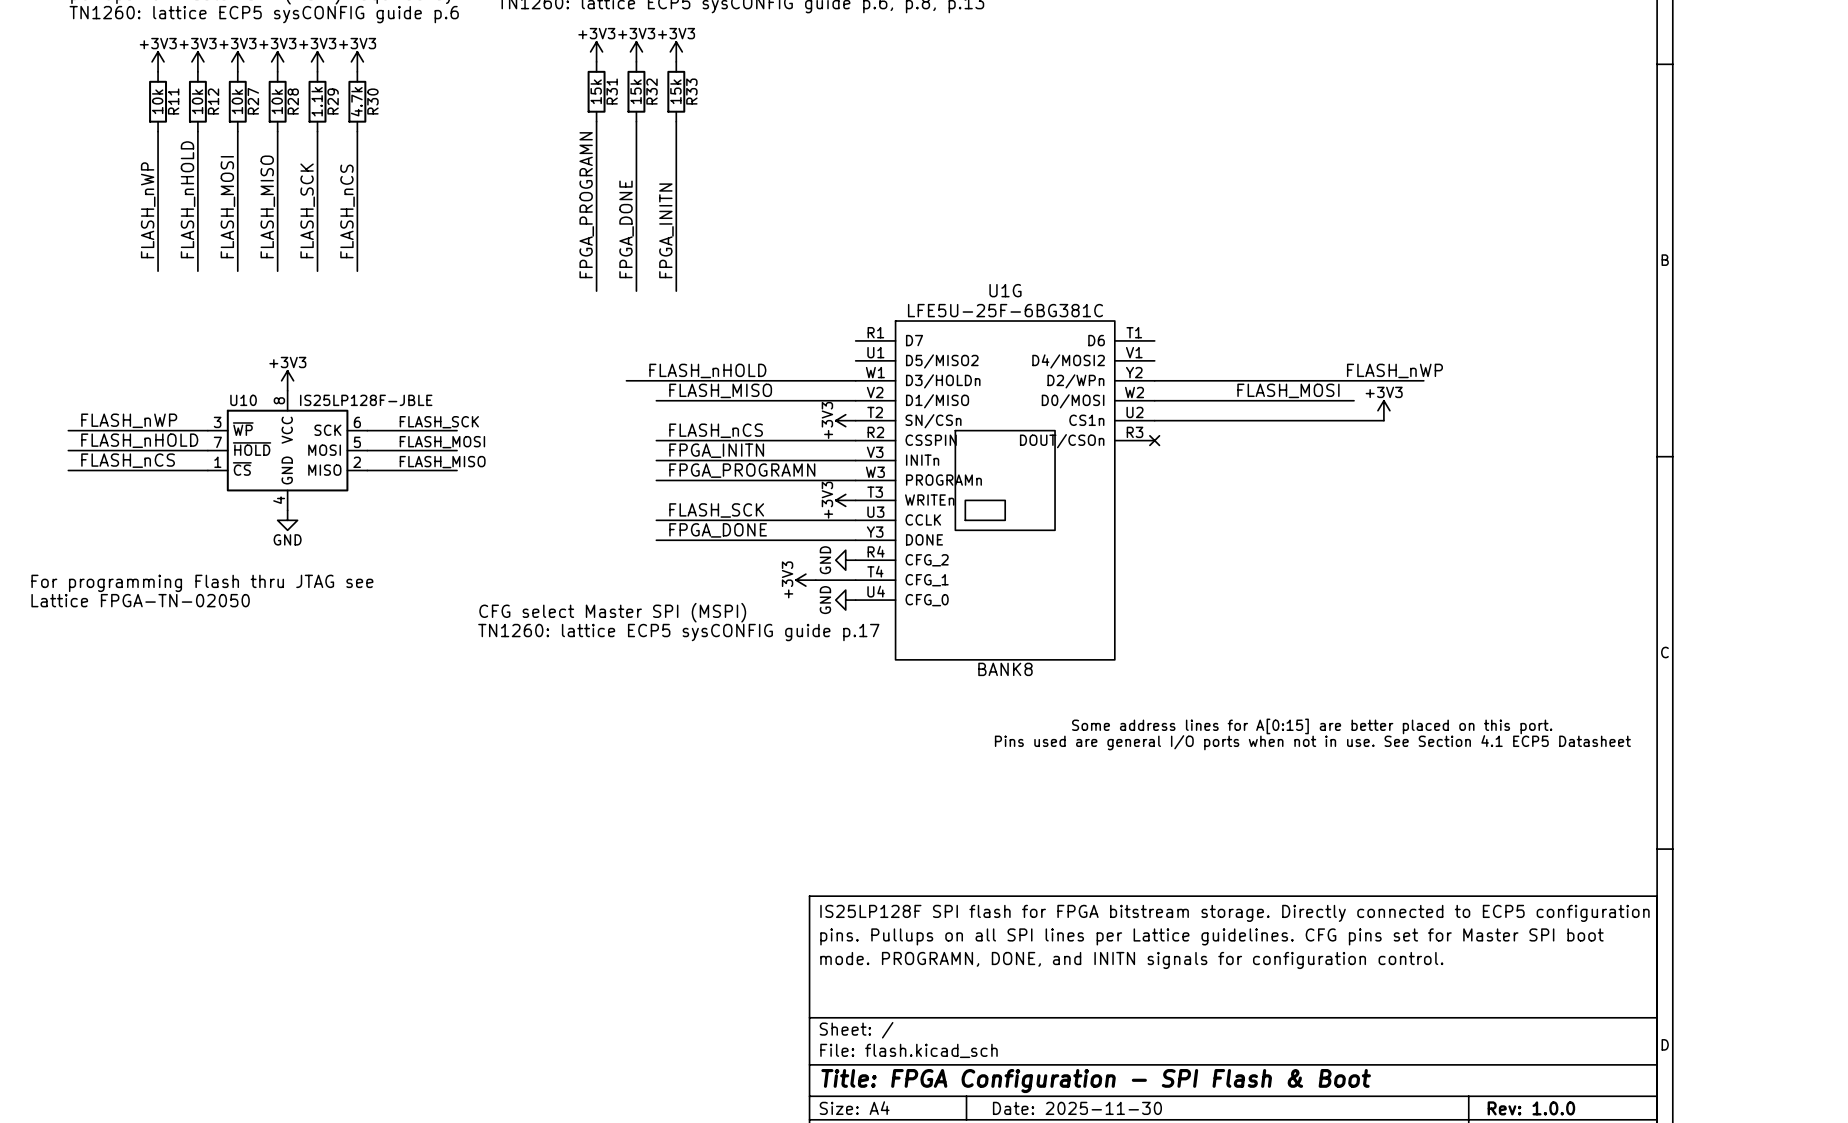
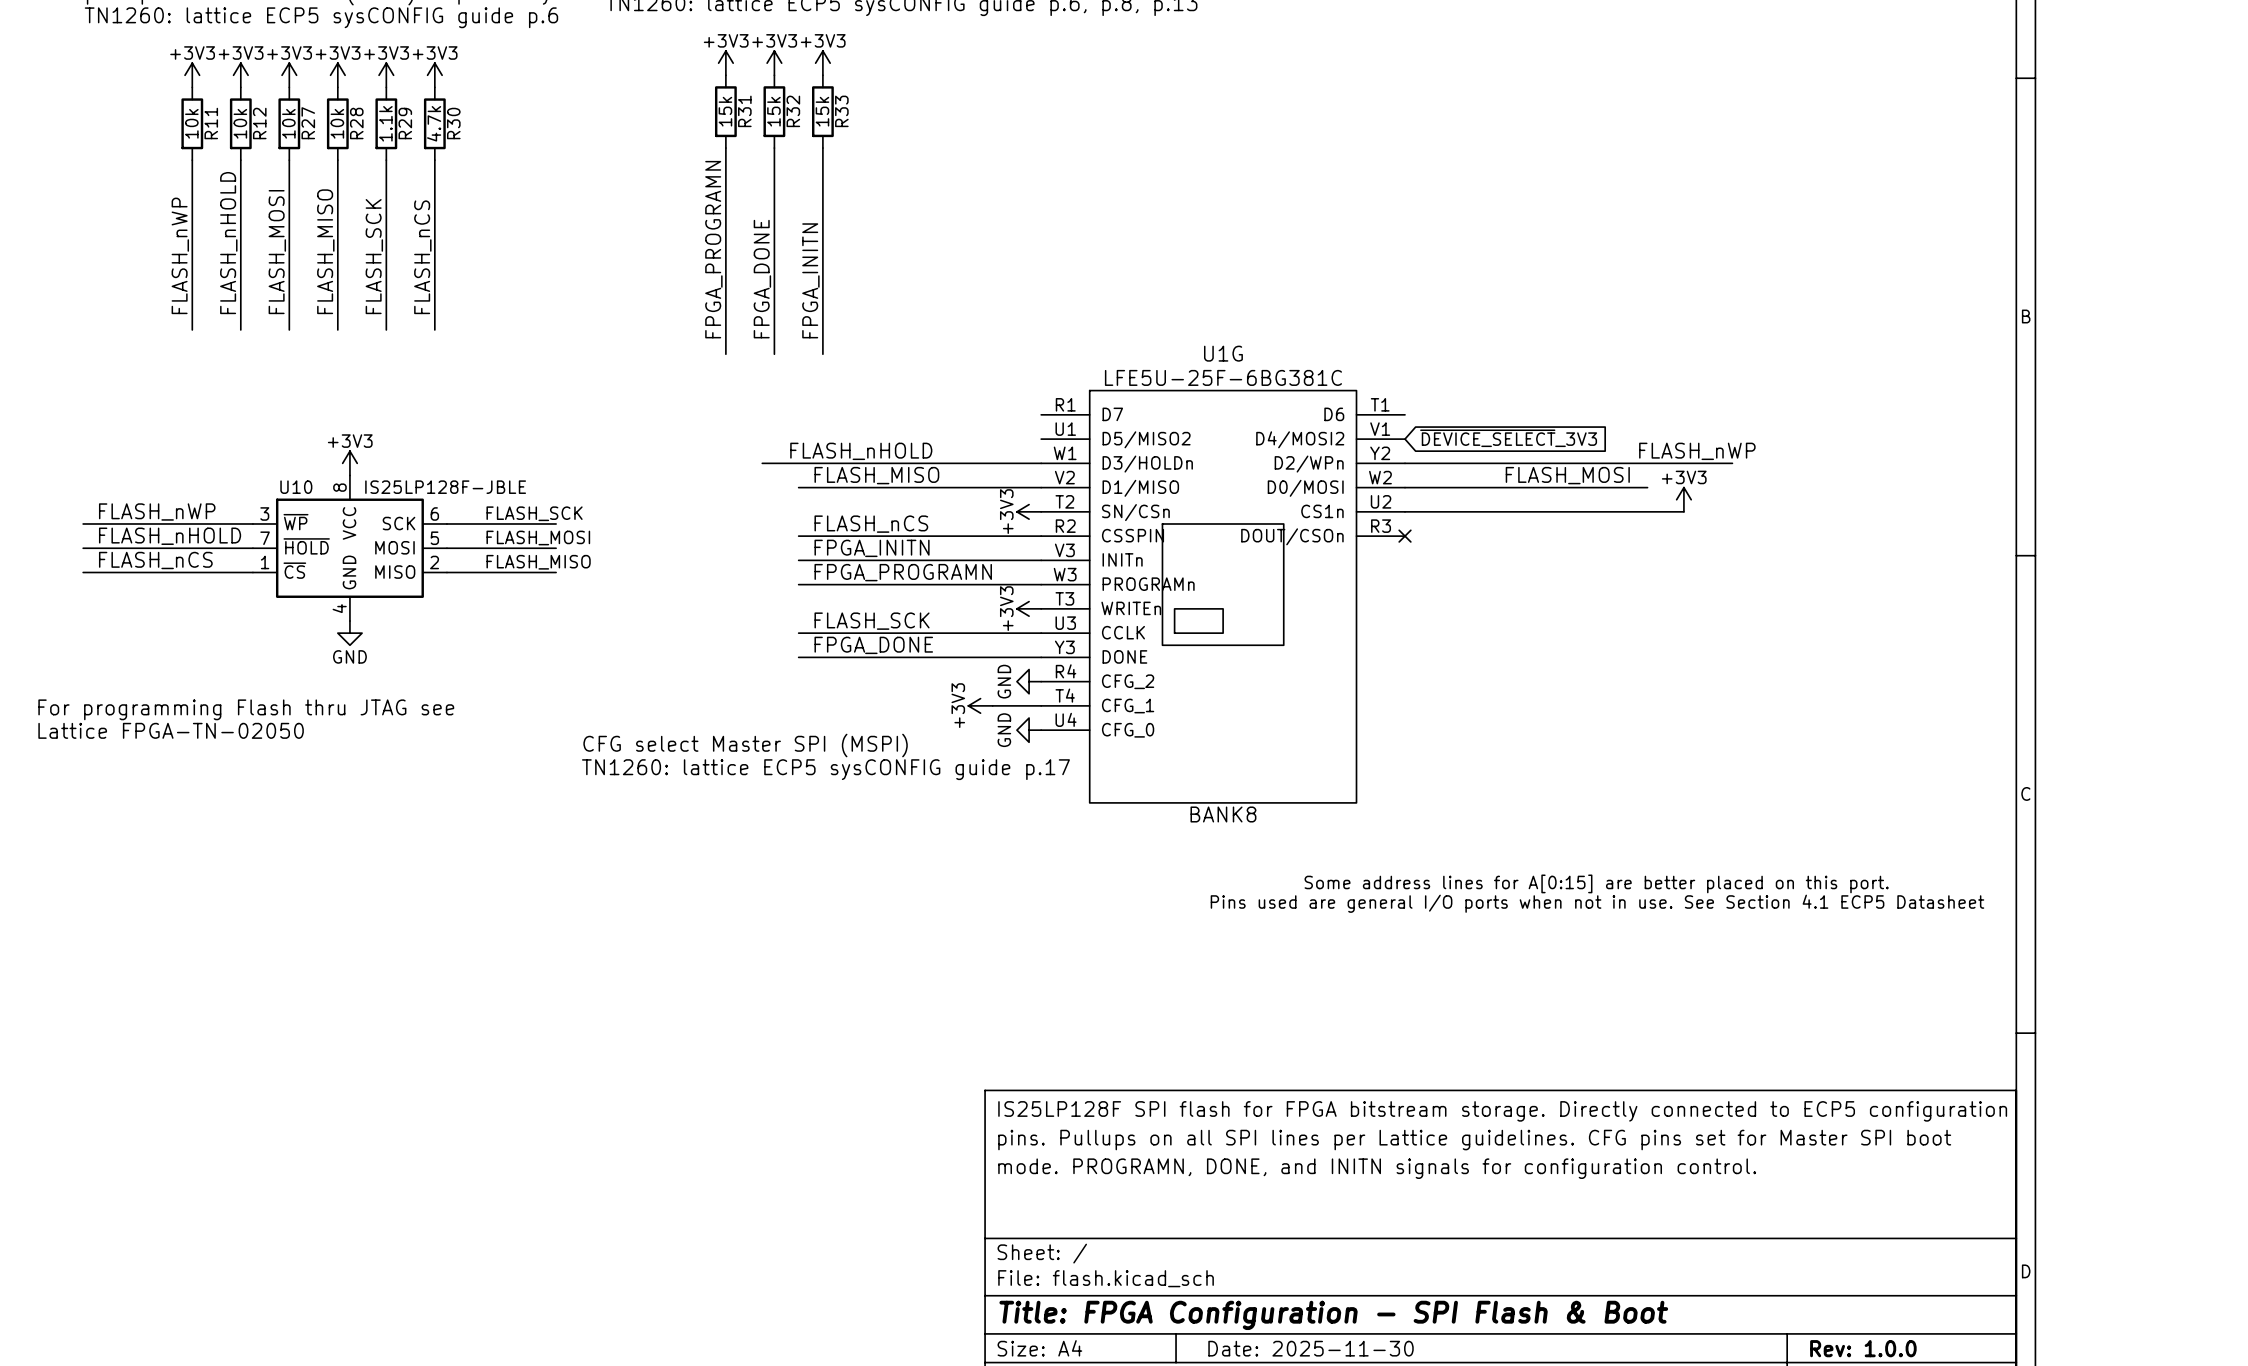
global label: none -> ~{DEVICE_SELECT}_3V3 (1508, 438)

